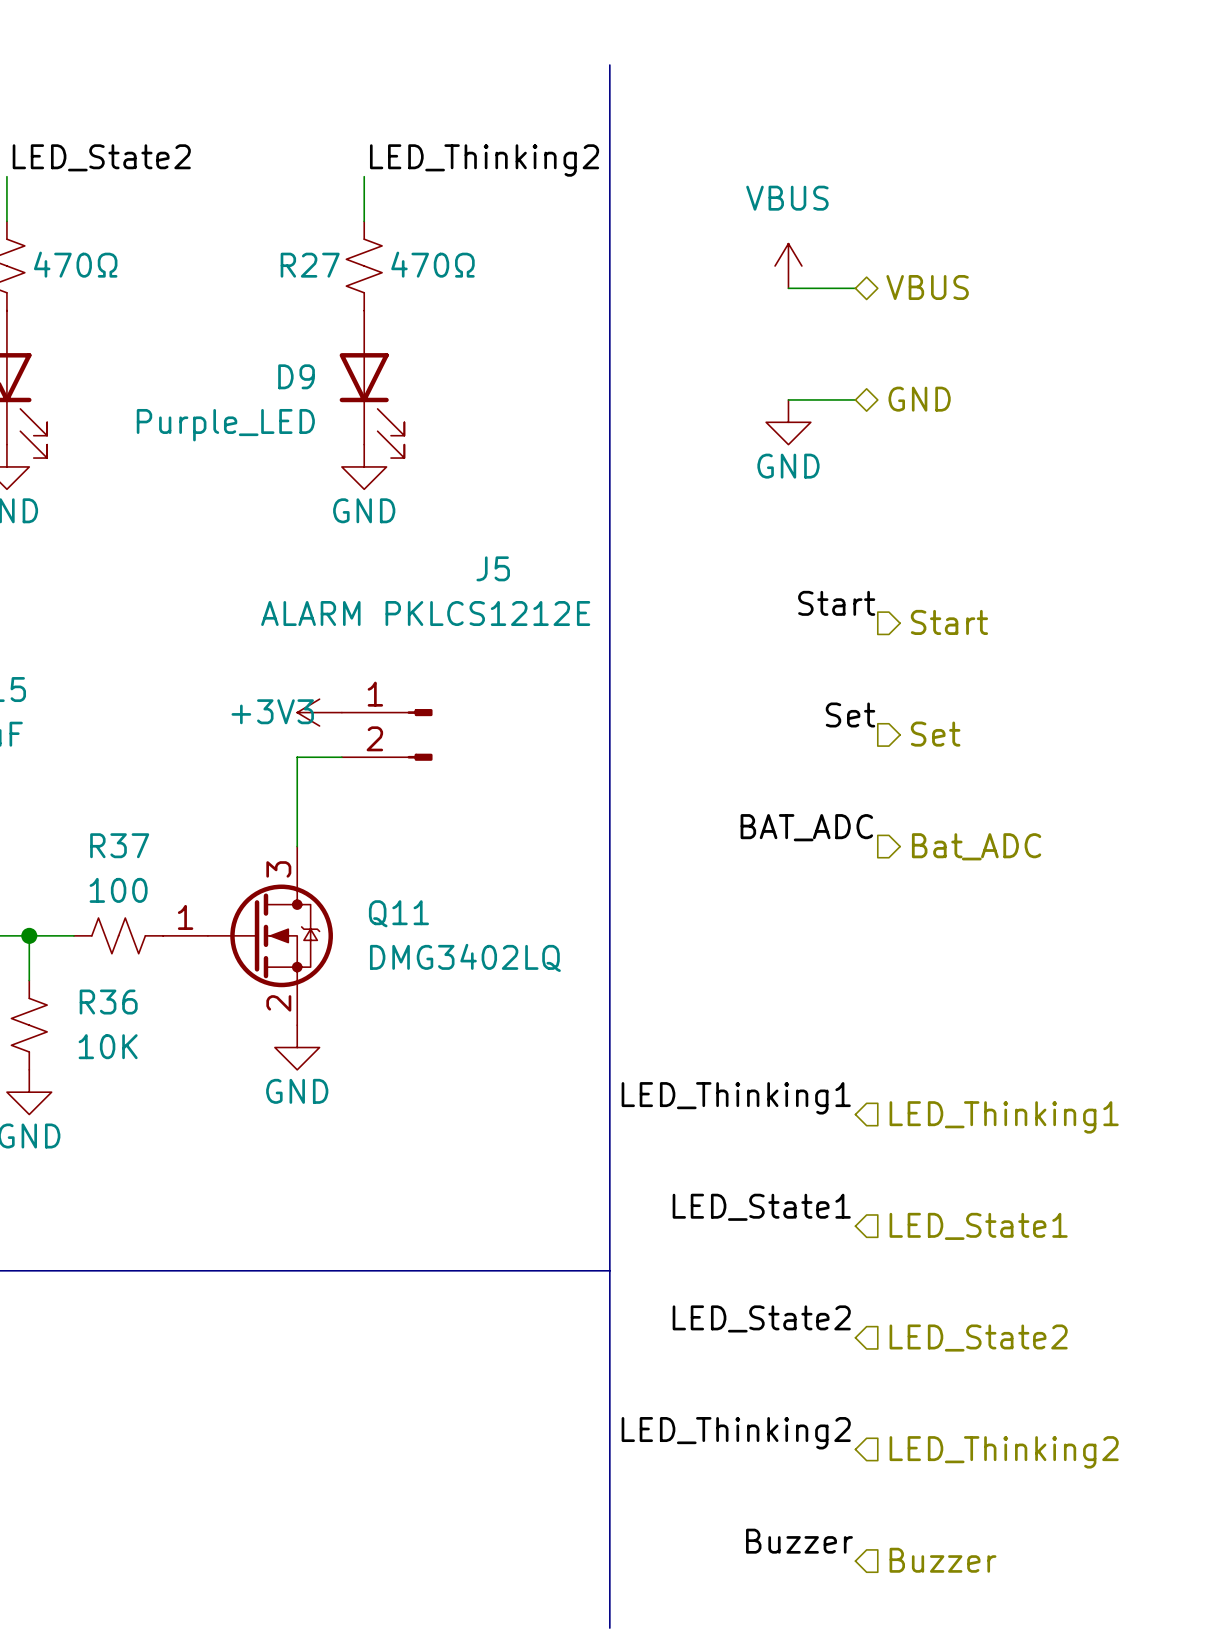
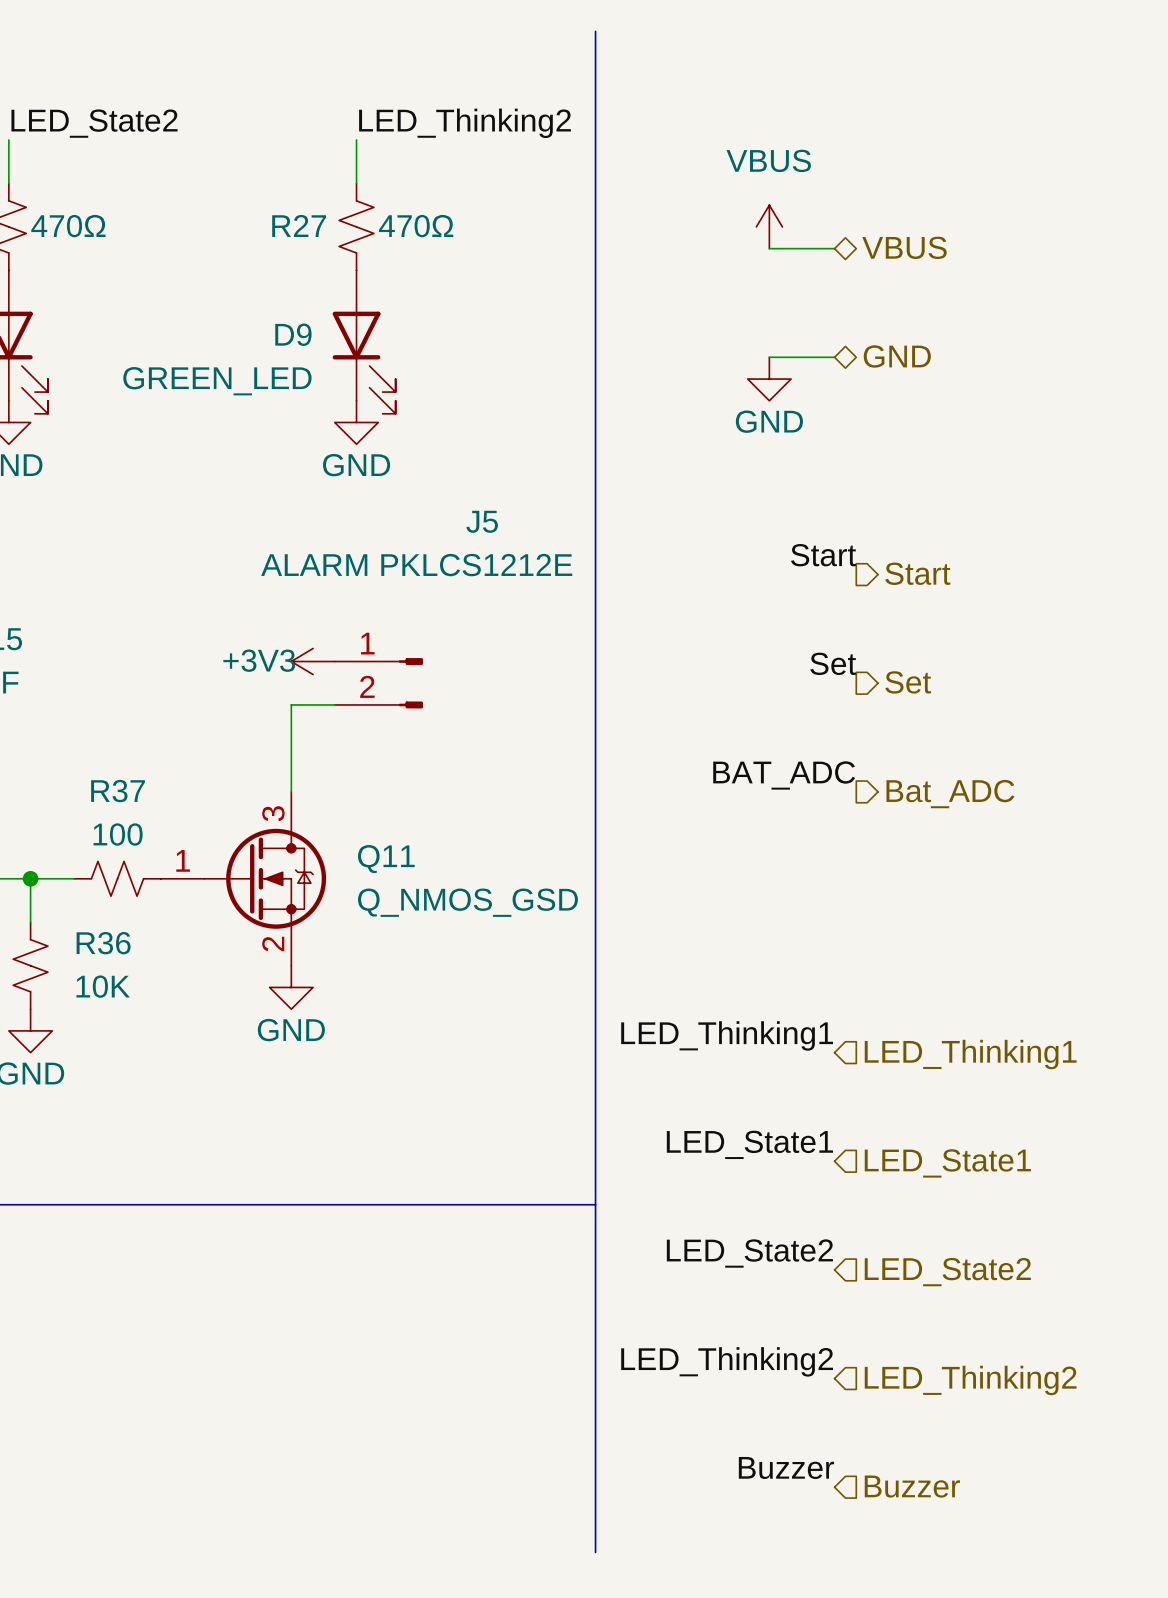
D9 value: Purple_LED (225, 425) -> GREEN_LED (217, 381)
Q11 value: DMG3402LQ (465, 957) -> Q_NMOS_GSD (467, 902)

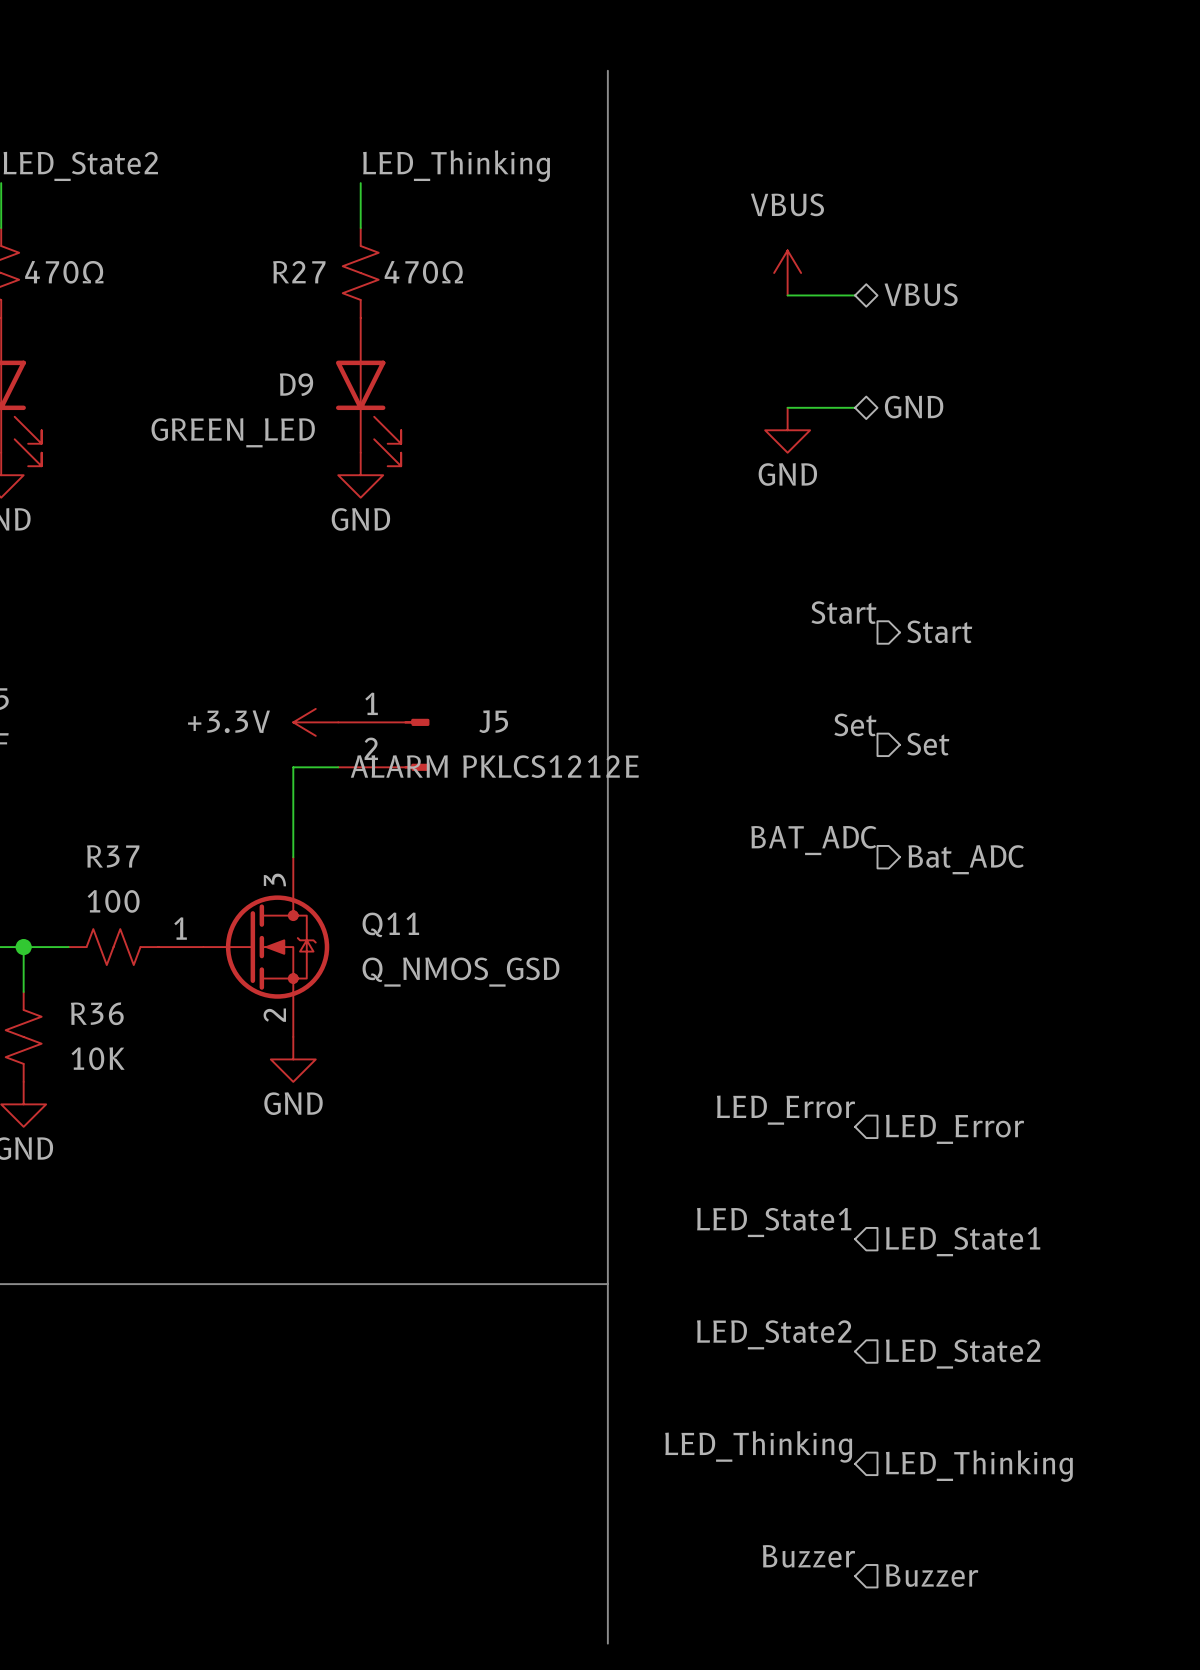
label: LED_Thinking2 (465, 123) -> LED_Thinking (456, 166)
J5 name position: J5 (482, 521) -> J5 (493, 721)
J5 value position: ALARM PKLCS1212E (416, 565) -> ALARM PKLCS1212E (494, 766)
power symbol: +3V3 (313, 661) -> +3.3V (315, 722)
label: LED_Thinking1 (727, 1035) -> LED_Error (786, 1110)
hierarchical label: LED_Thinking1 (970, 1054) -> LED_Error (954, 1129)
label: LED_Thinking2 (727, 1361) -> LED_Thinking (758, 1446)
hierarchical label: LED_Thinking2 (970, 1380) -> LED_Thinking (979, 1466)

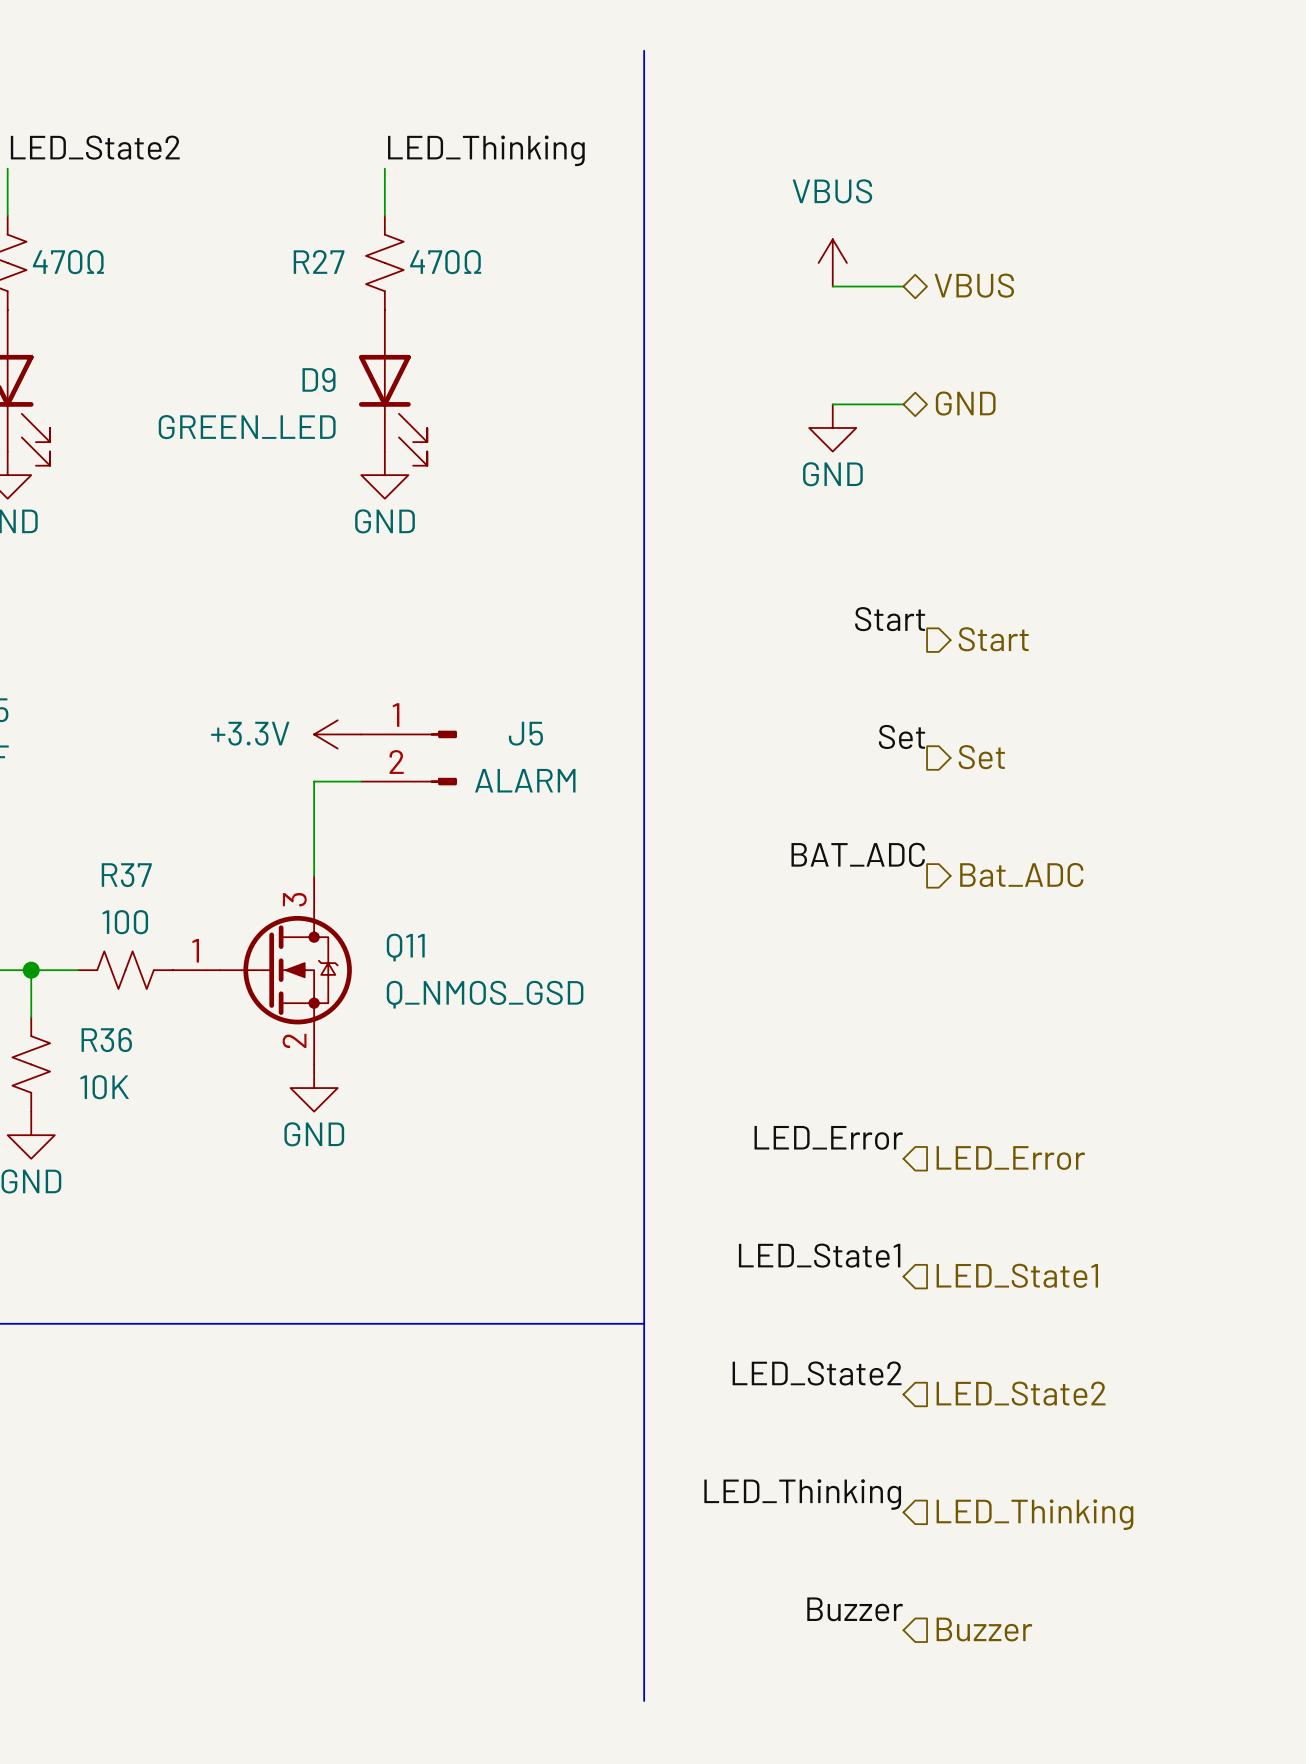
J5 value: ALARM PKLCS1212E (494, 766) -> ALARM (525, 780)

